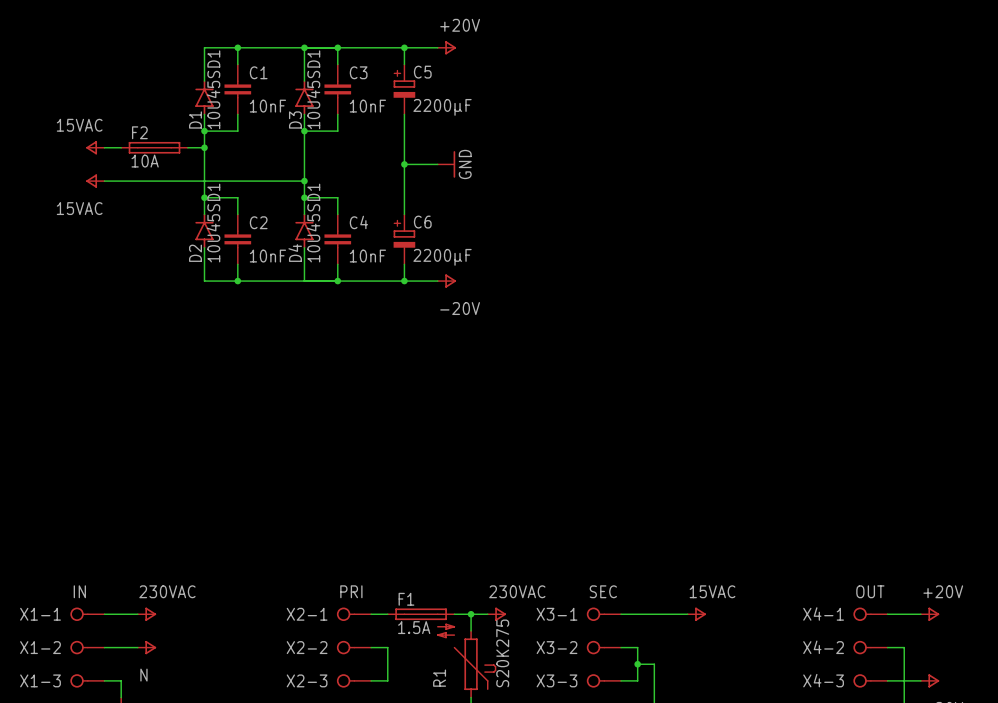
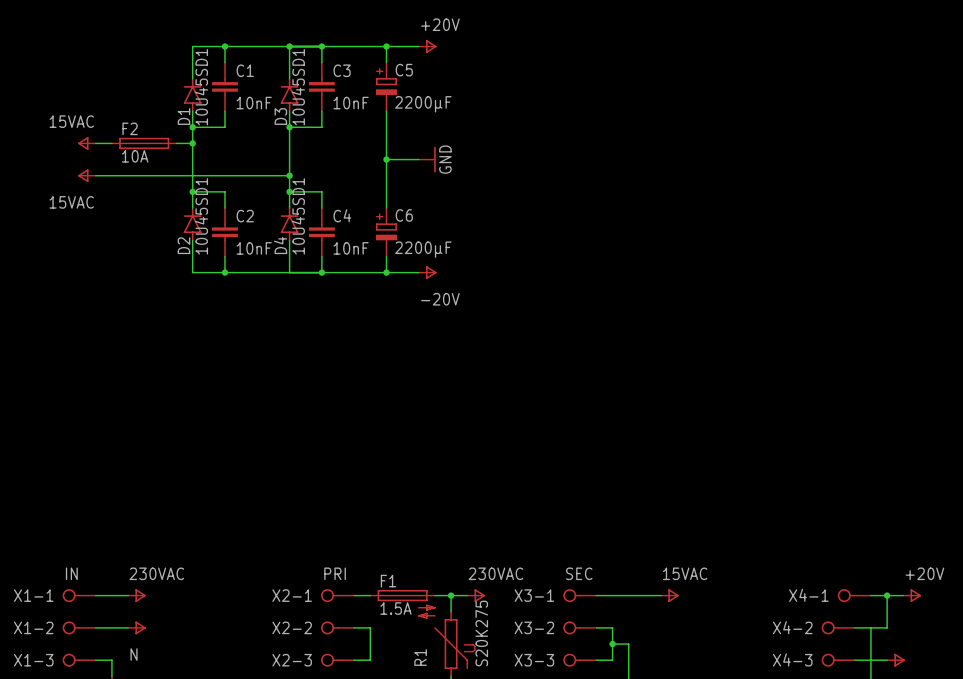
X4-3 value: OUT (870, 591) -> none
X4-1 position: (870, 614) -> (854, 595)
junction: none -> (887, 595)
power symbol position: +20V (930, 614) -> +20V (912, 595)
wire: none -> (903, 595) (887, 595) (887, 627) (870, 627)

